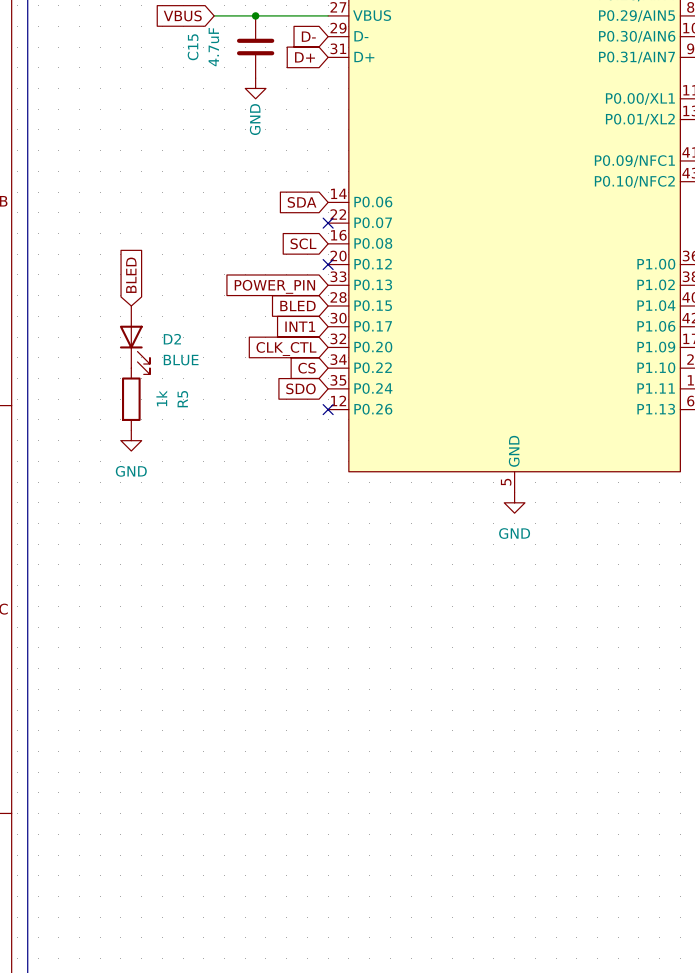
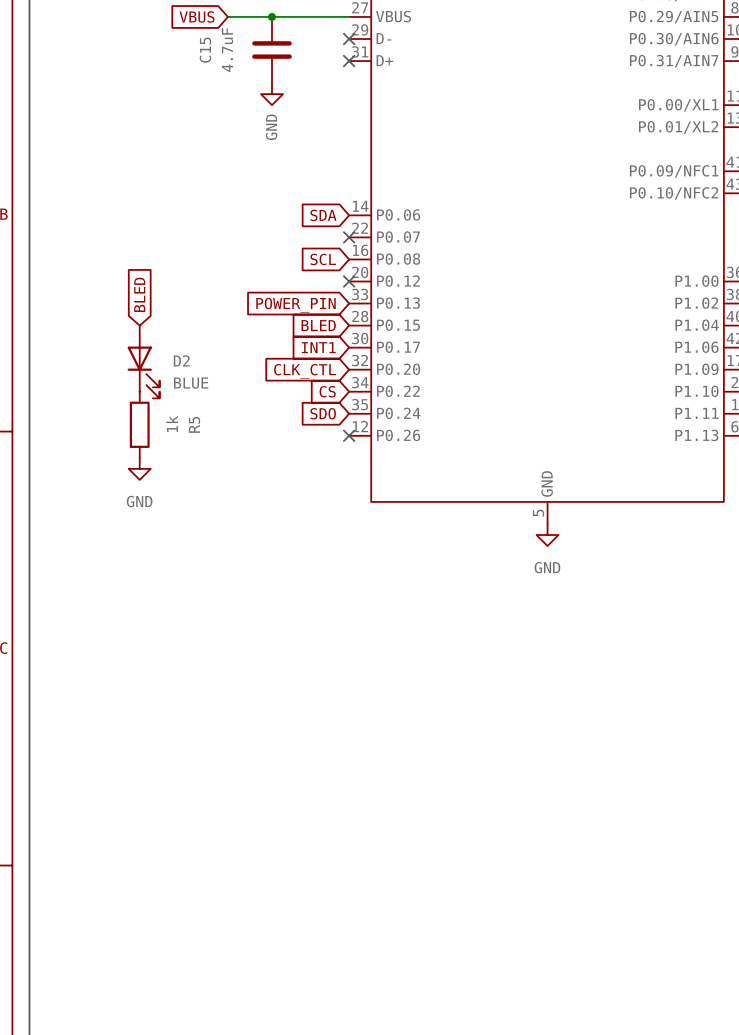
global label: D- (308, 36) -> none
no-connect mark: none -> (349, 39)
global label: D+ (305, 57) -> none
no-connect mark: none -> (349, 61)

